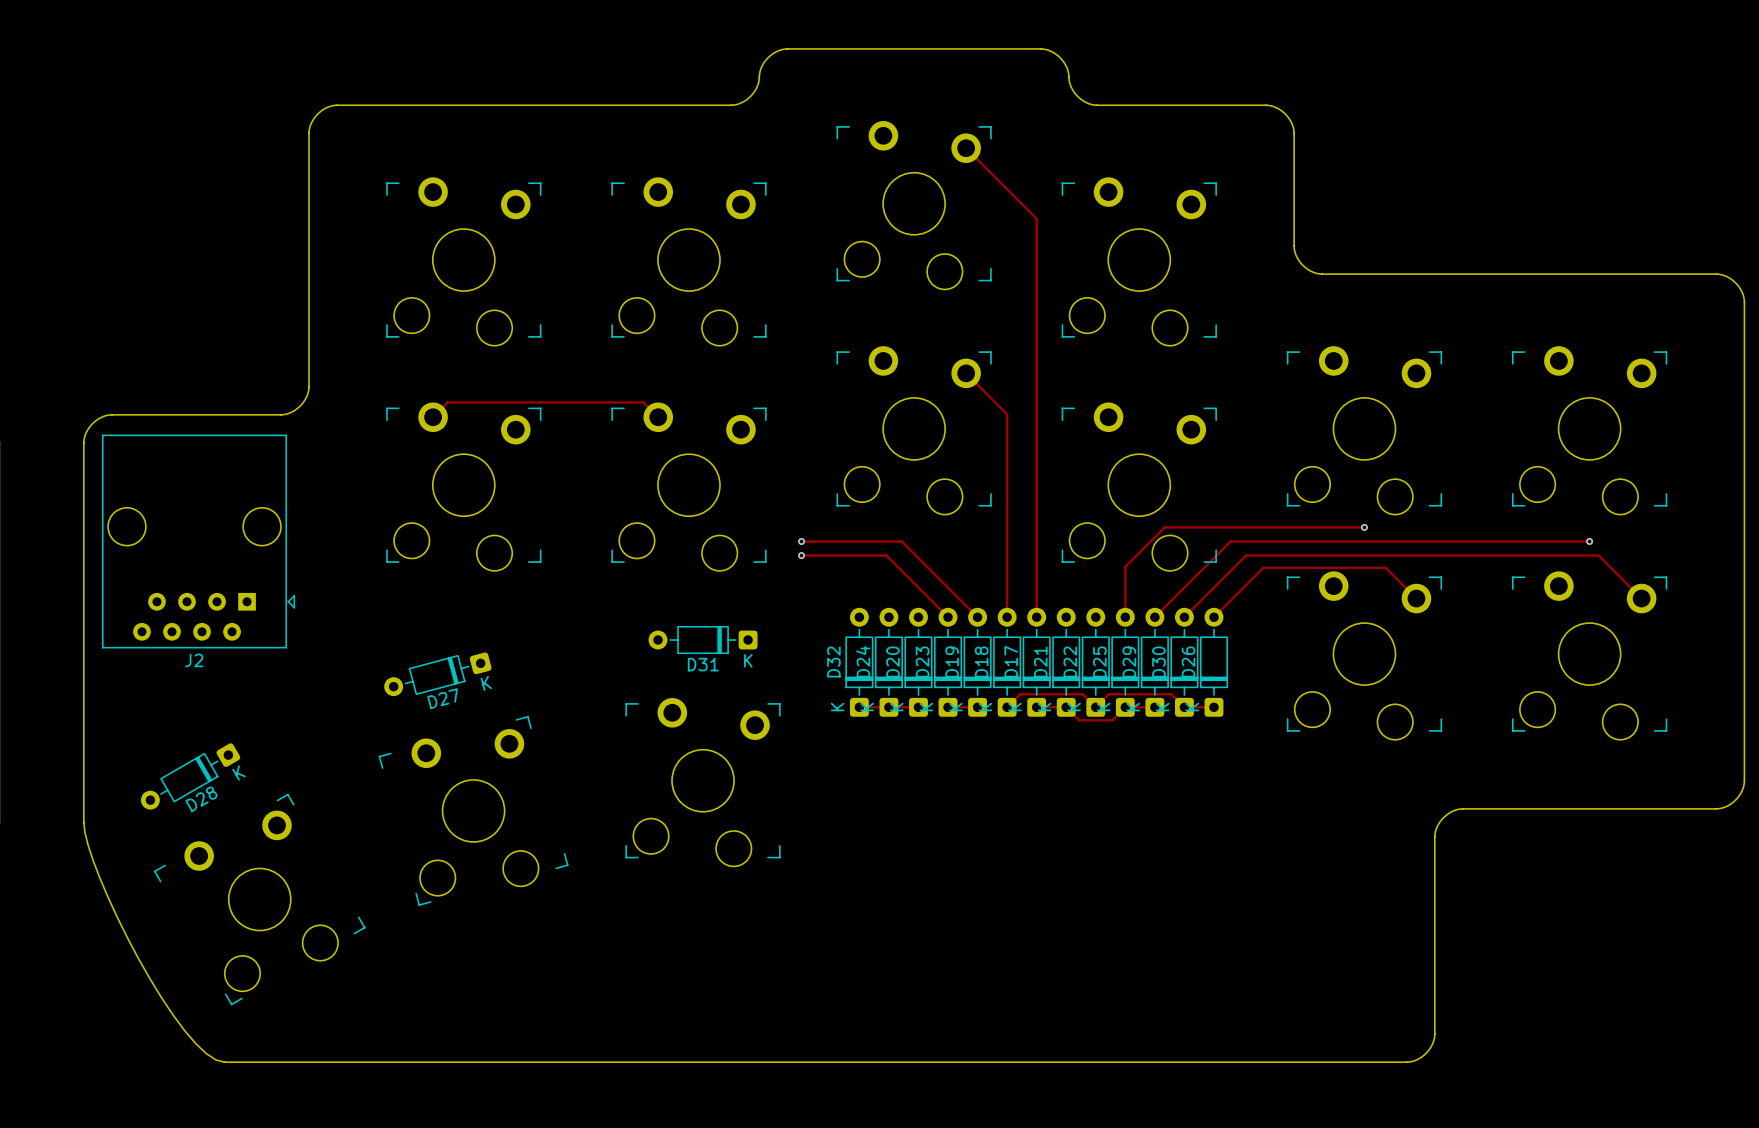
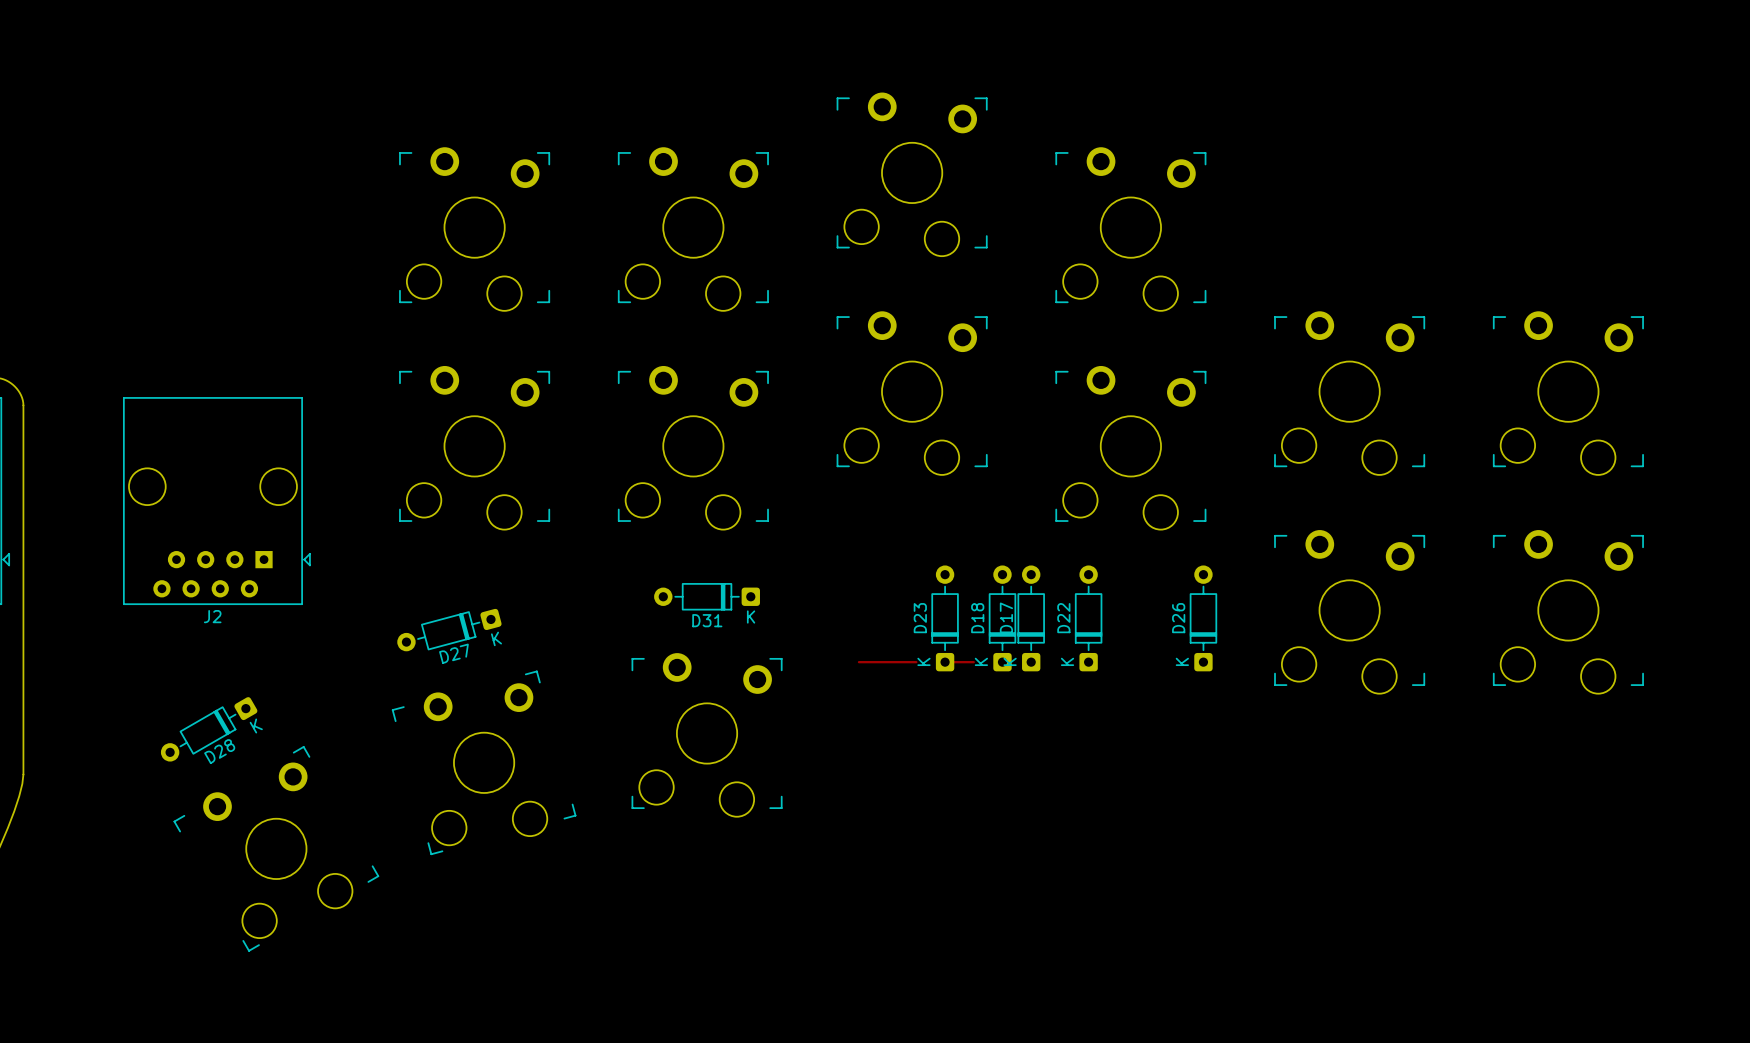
board edge: (787, 48) (1043, 49) (1053, 52) (1062, 59) (1067, 69) (1069, 82) (1074, 92) (1081, 100) (1091, 104) (1265, 105) (1276, 107) (1288, 118) (1293, 130) (1294, 251) (1302, 265) (1316, 273) (1716, 274) (1724, 275) (1733, 281) (1742, 291) (1744, 302) (1744, 780) (1743, 788) (1737, 798) (1726, 806) (1716, 808) (1462, 808) (1455, 810) (1445, 815) (1437, 826) (1434, 837) (1434, 1036) (1432, 1044) (1426, 1053) (1417, 1059) (1409, 1062) (224, 1062) (216, 1059) (206, 1053) (173, 1015) (138, 958) (99, 878) (84, 832) (83, 442) (87, 430) (96, 420) (109, 415) (283, 414) (293, 411) (303, 401) (309, 386) (309, 130) (314, 118) (324, 108) (337, 105) (733, 105) (743, 101) (754, 92) (758, 82) (760, 69) (768, 57) (777, 51) (787, 48) -> none
track: (966, 148) (1036, 218) (1036, 617) -> none
track: (966, 373) (1007, 414) (1007, 617) -> none
track: (433, 417) (447, 402) (643, 402) (658, 417) -> none
track: (1364, 527) (1164, 527) (1125, 566) (1125, 617) -> none
via: (1364, 527) -> none
track: (801, 541) (901, 541) (977, 617) -> none
via: (801, 541) -> none
track: (1589, 541) (1230, 541) (1154, 617) -> none
via: (1589, 541) -> none
track: (801, 555) (886, 555) (948, 617) -> none
via: (801, 555) -> none
track: (1416, 598) (1385, 567) (1263, 567) (1213, 617) -> none
track: (1641, 598) (1598, 555) (1246, 555) (1184, 617) -> none
D32: (859, 662) -> none
D24: (888, 662) -> none
D20: (918, 662) -> none
D19: (977, 662) -> none
D21: (1066, 662) -> none
D25: (1125, 662) -> none
D29: (1154, 662) -> none
D30: (1184, 662) -> none
track: (1007, 707) (1020, 694) (1082, 694) (1095, 707) (1108, 694) (1171, 694) (1184, 707) (1213, 707) -> none
track: (1036, 707) (1066, 707) (1079, 720) (1112, 720) (1125, 707) (1154, 707) -> none

